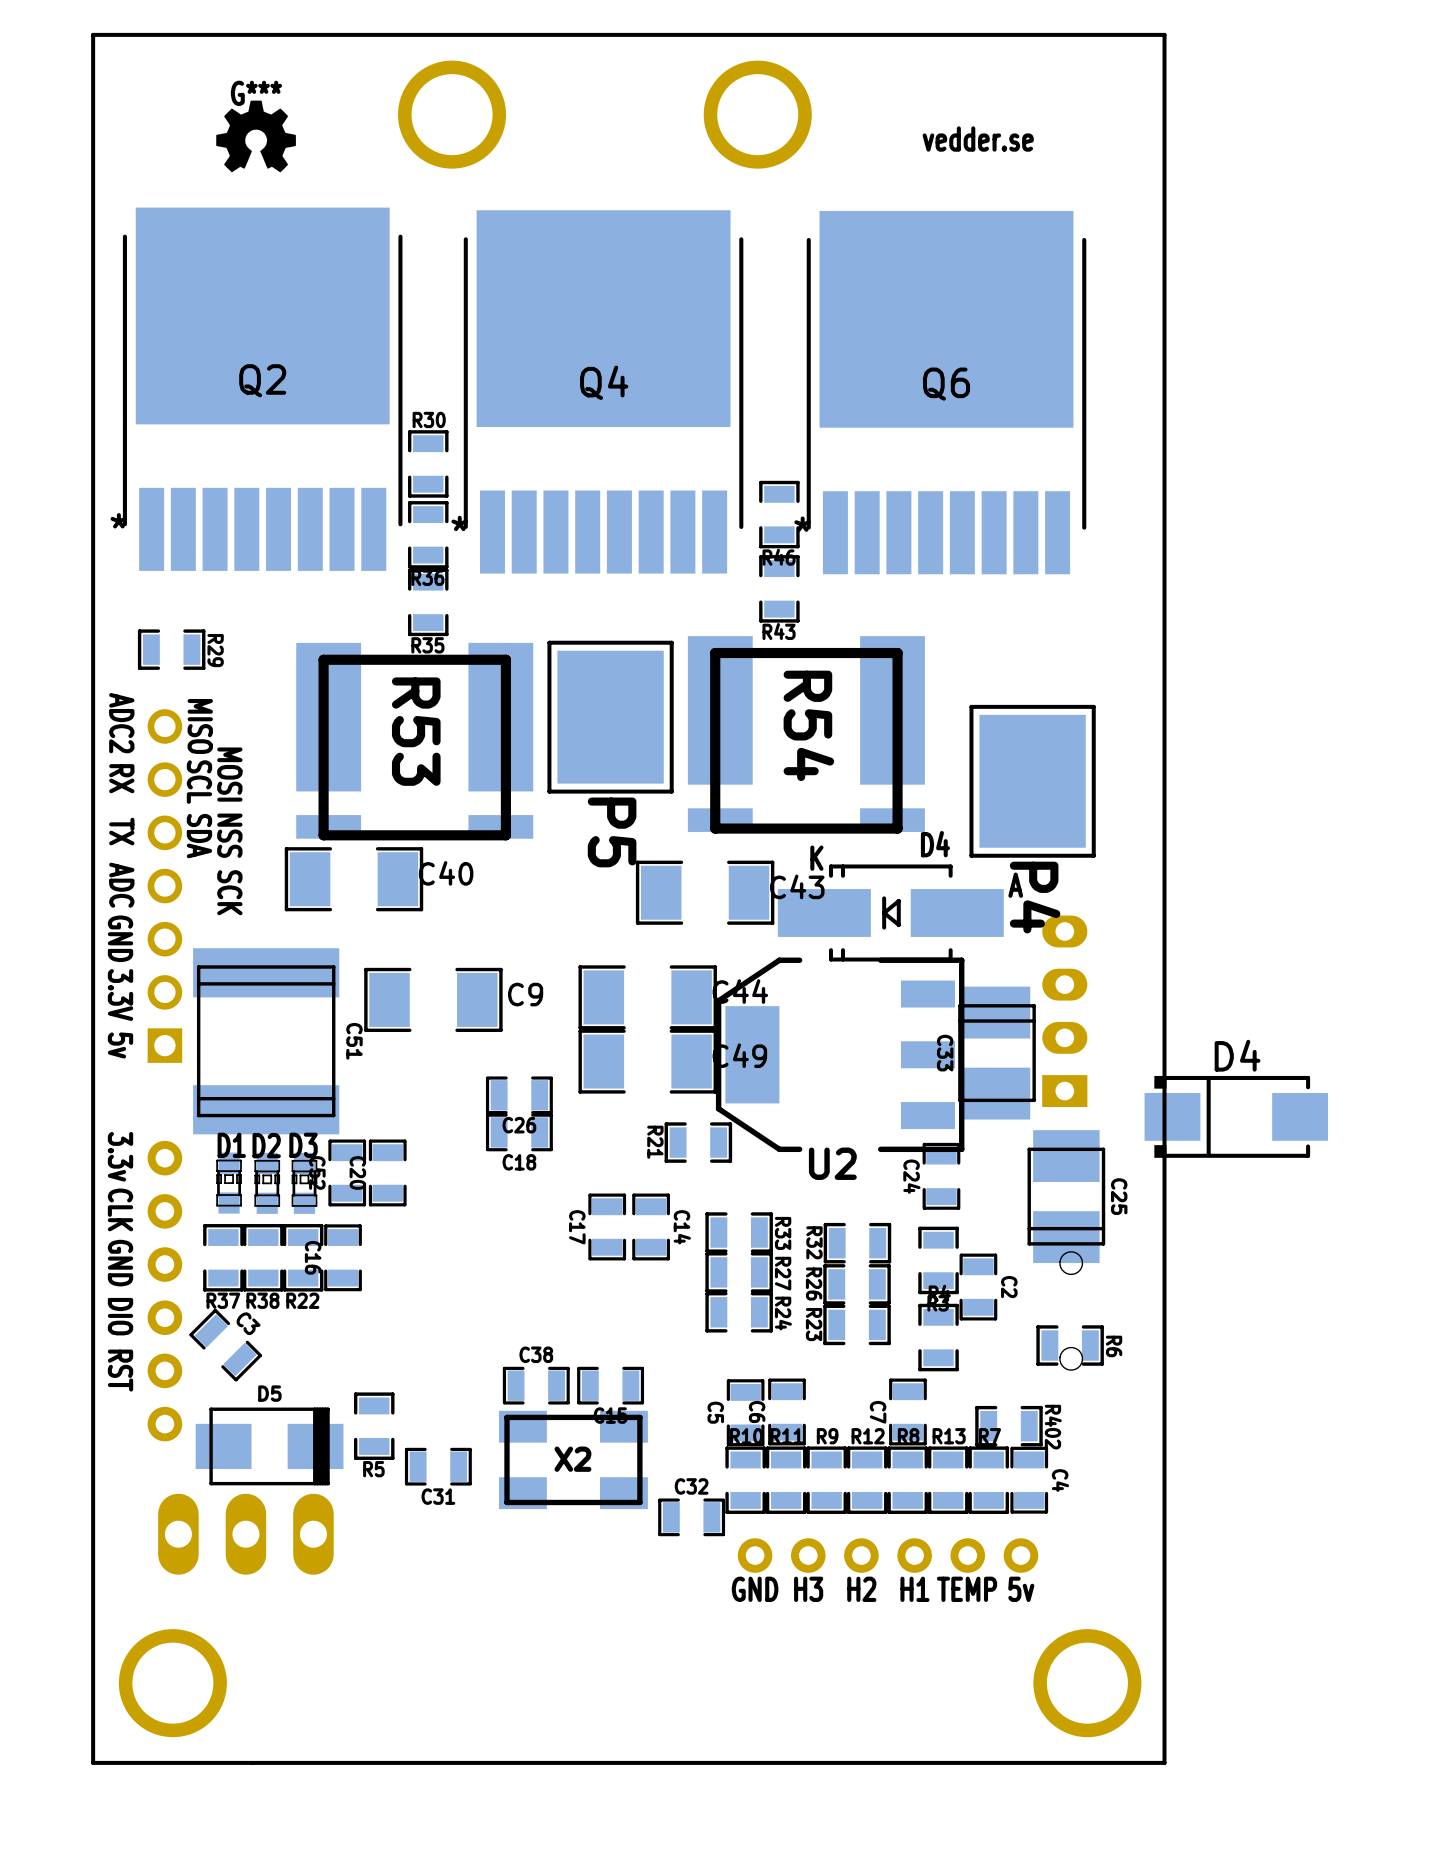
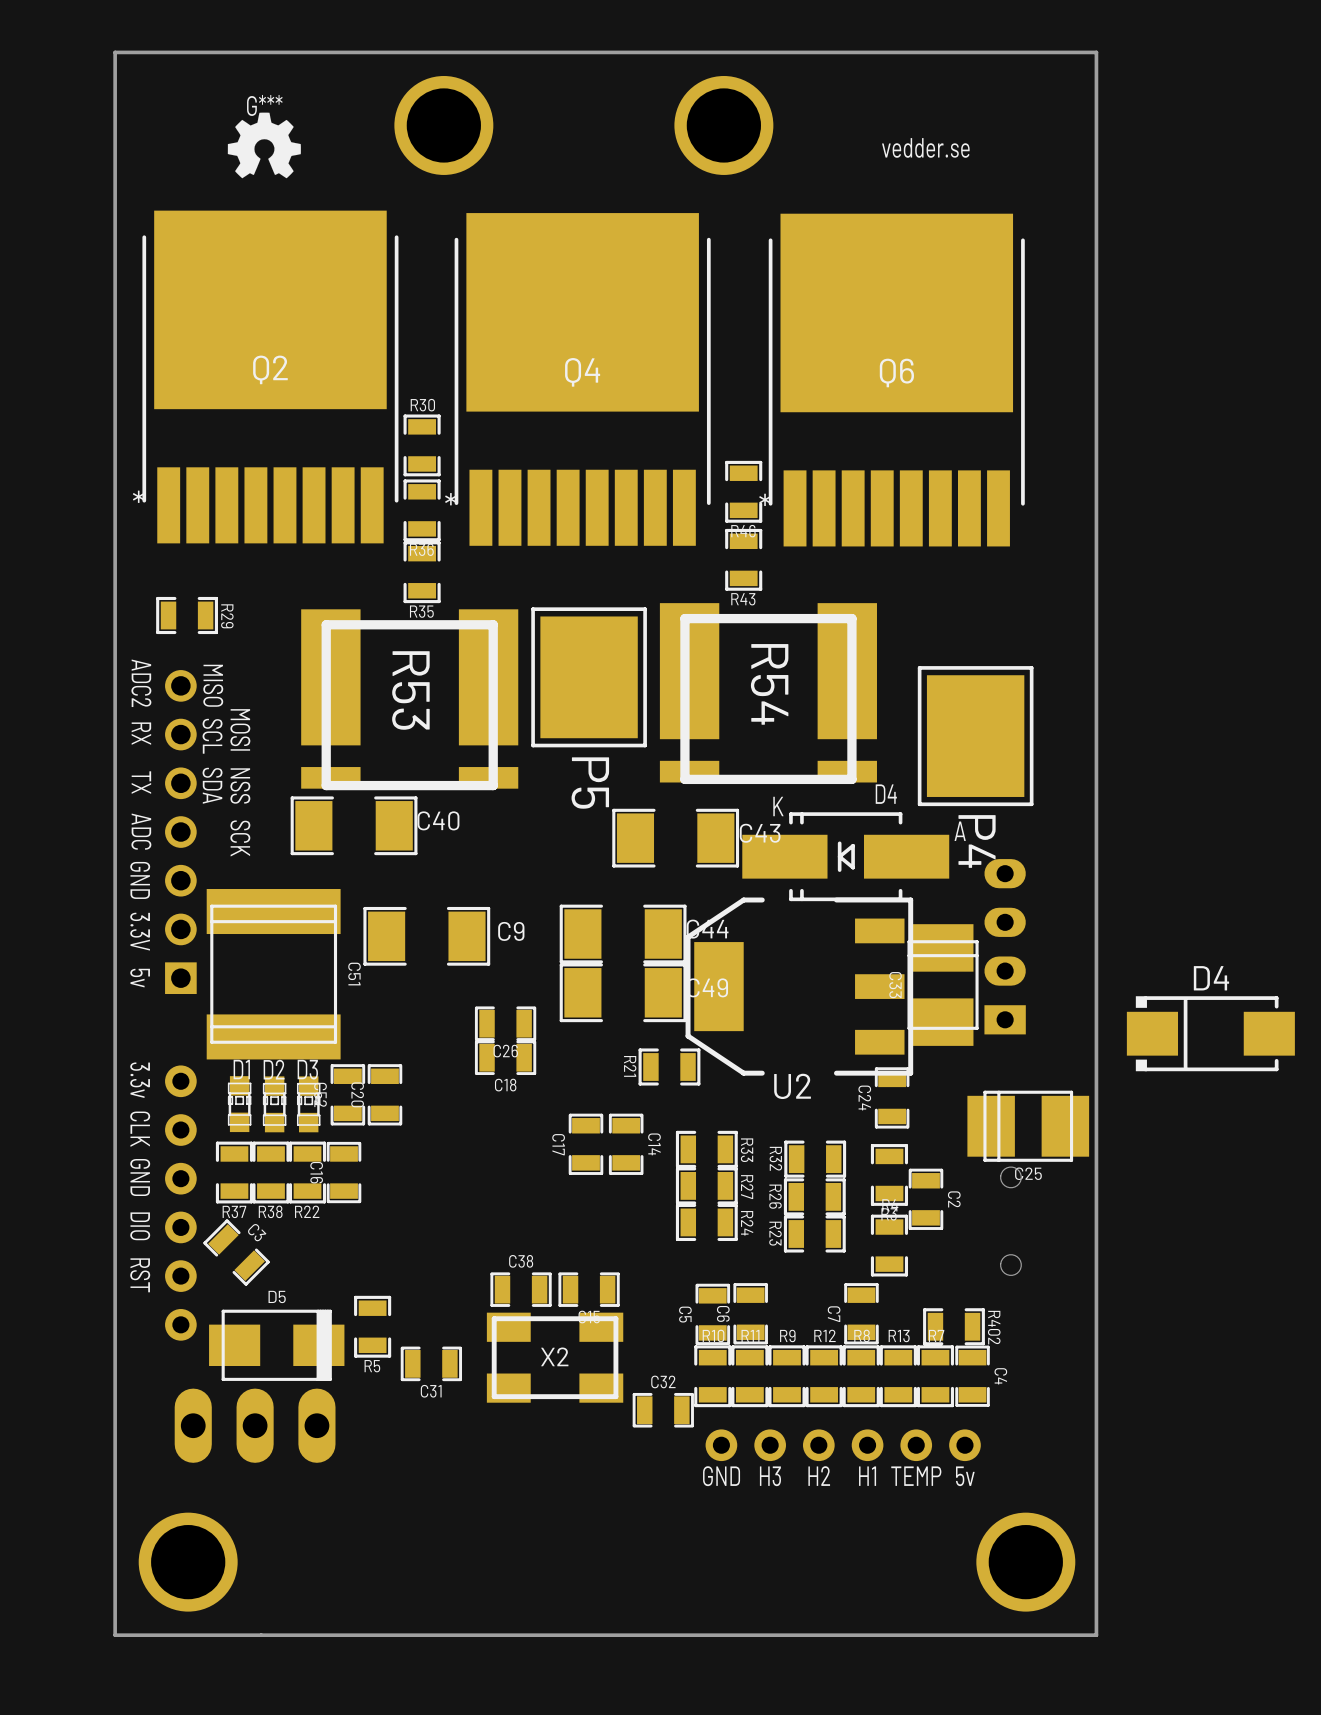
D4 position: (1236, 1116) -> (1210, 1033)
C25 rotation: 0° (1066, 1196) -> 90° clockwise (1028, 1126)
R6: (1070, 1345) -> none

